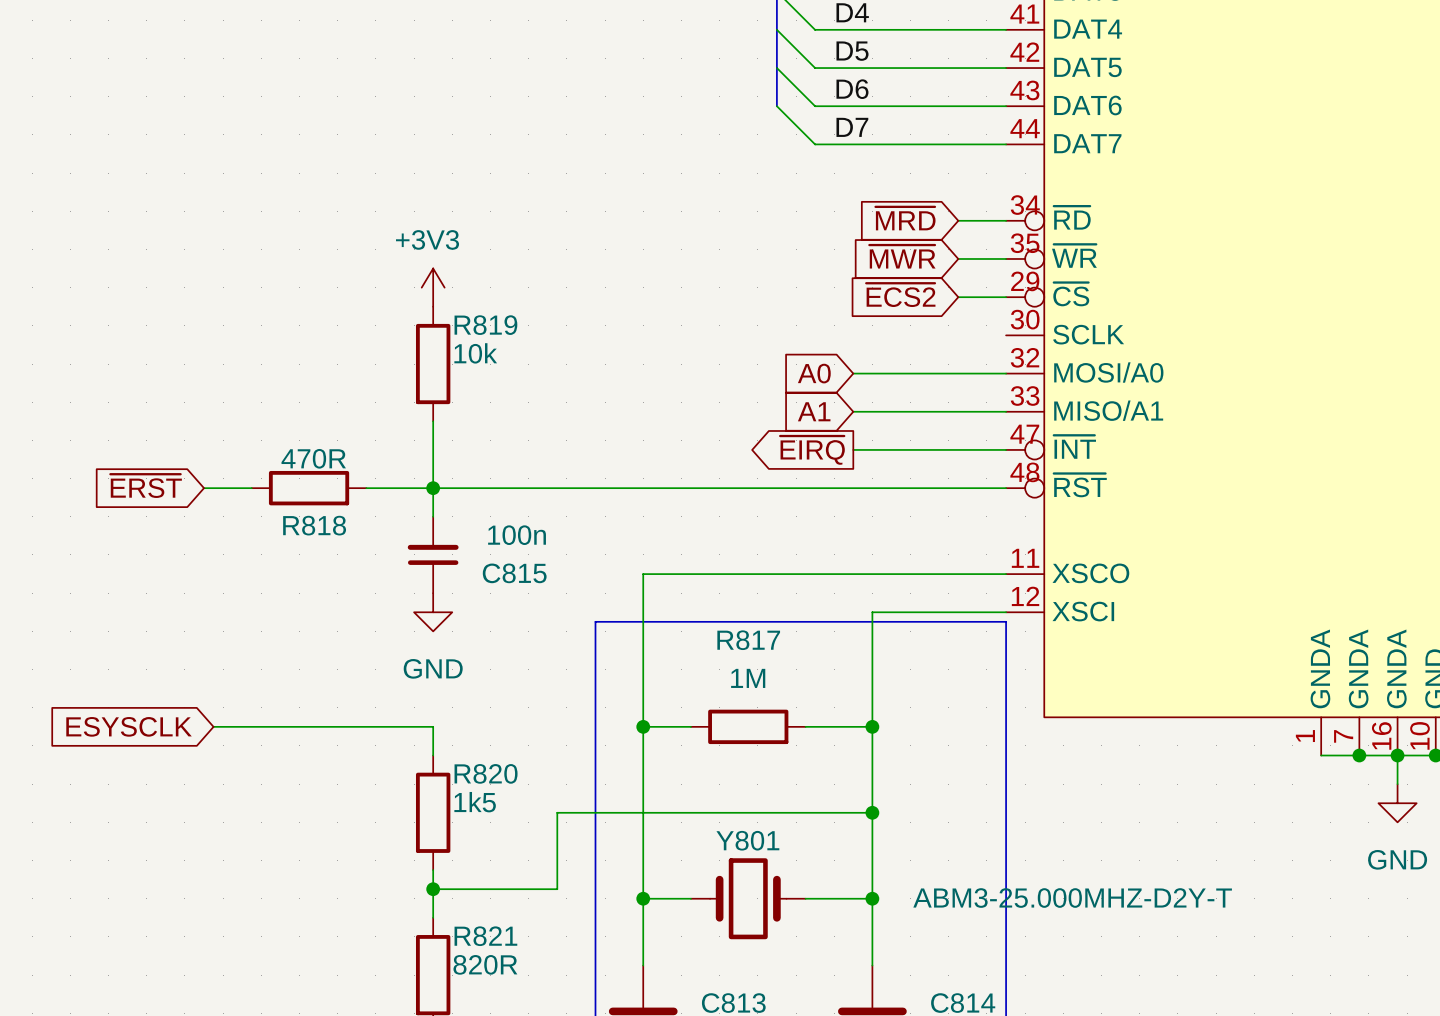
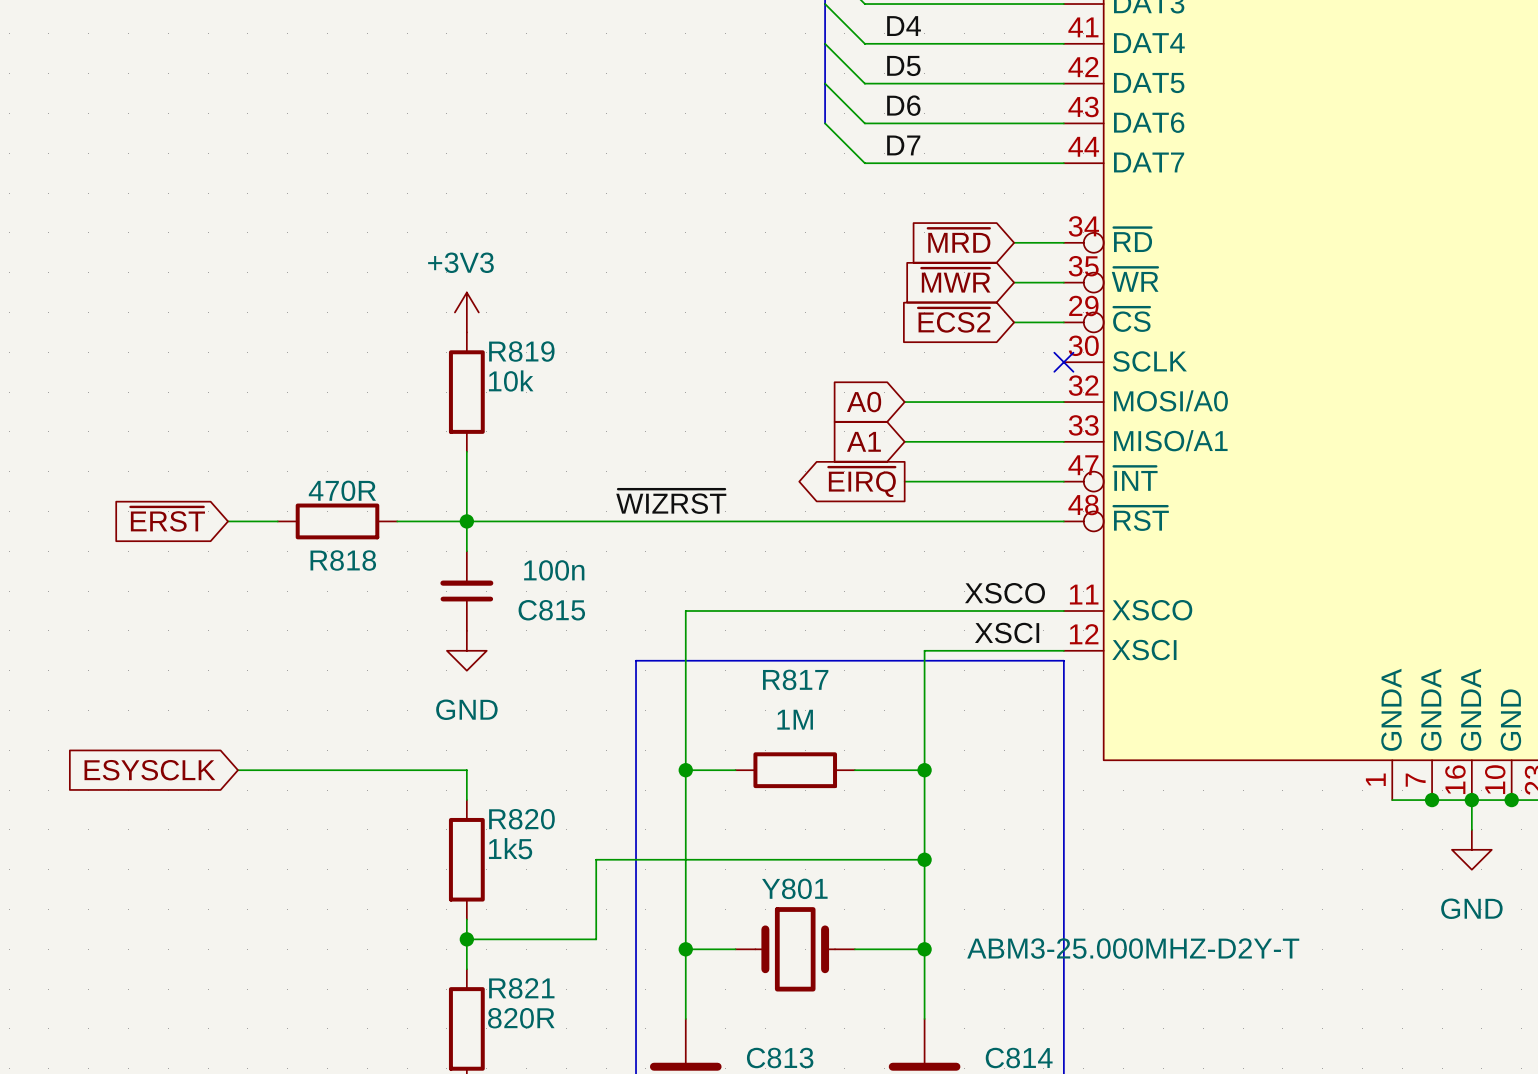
no-connect mark: none -> (1063, 362)
label: none -> ~{WIZRST} (671, 501)
label: none -> XSCO (1005, 593)
label: none -> XSCI (1007, 633)

